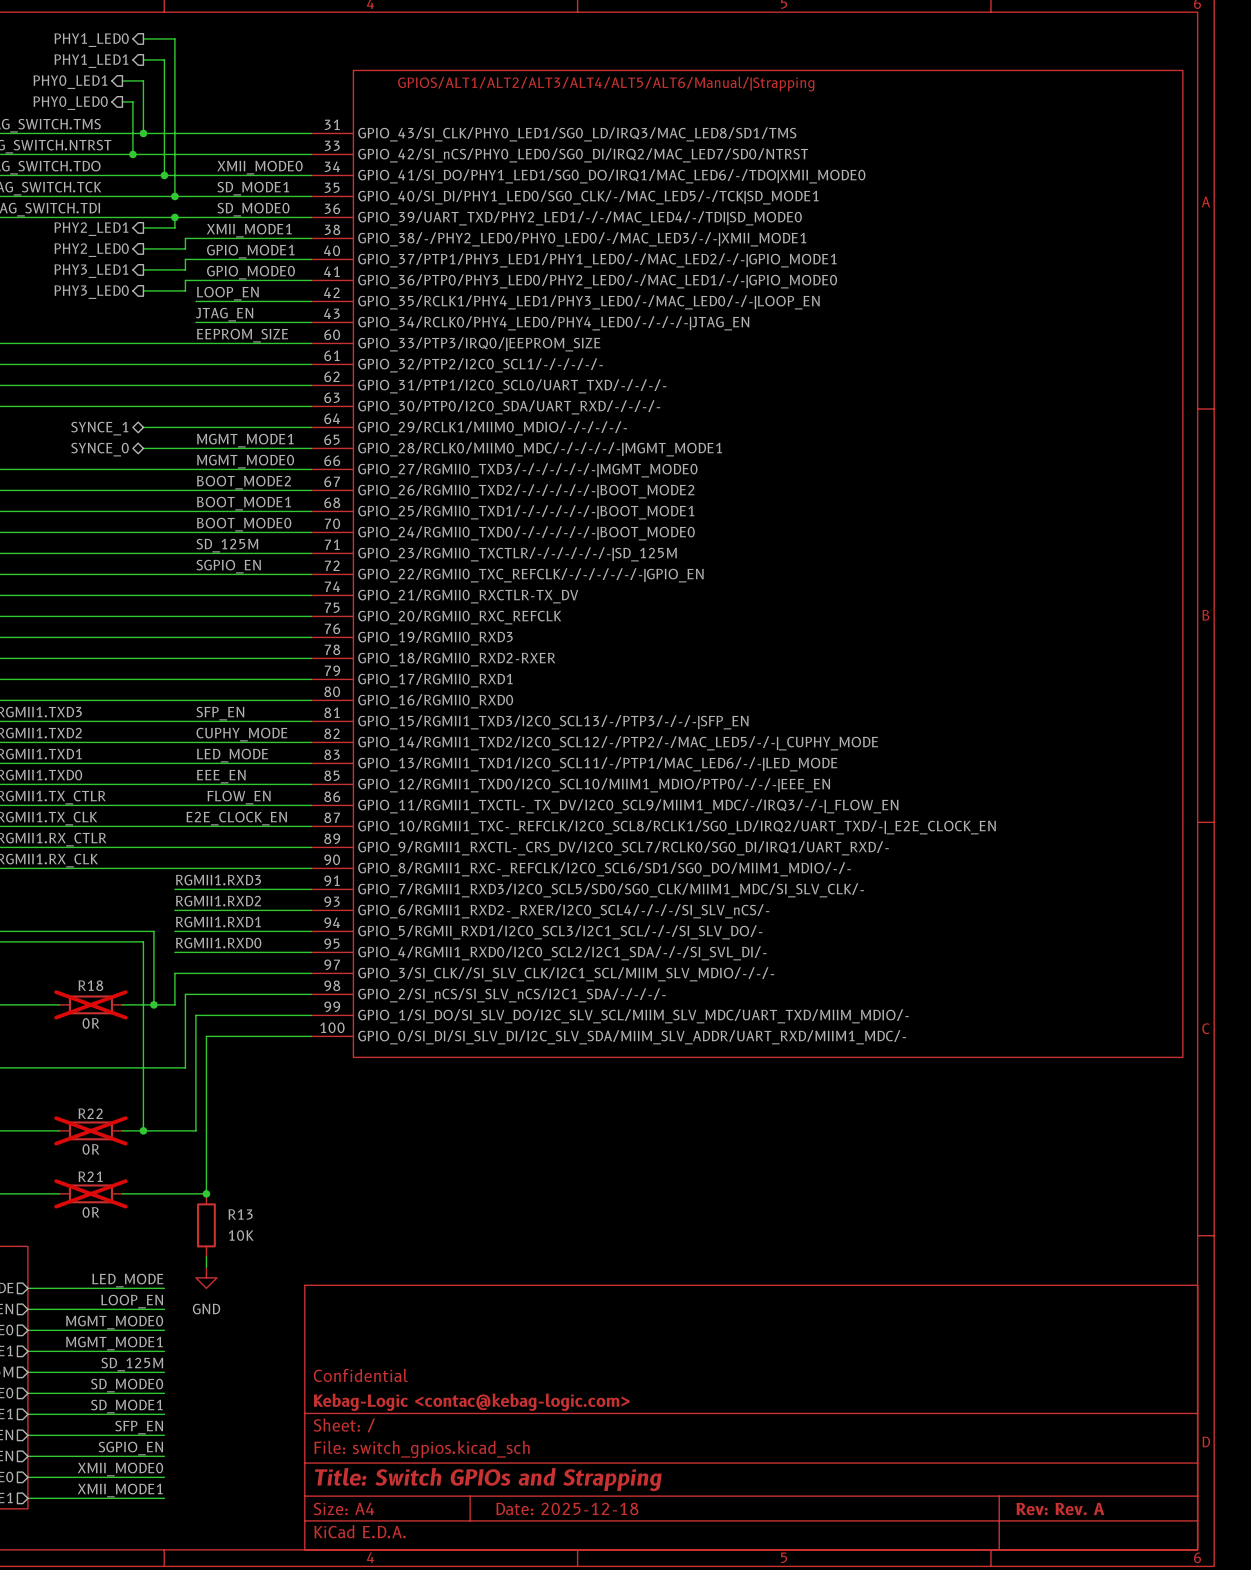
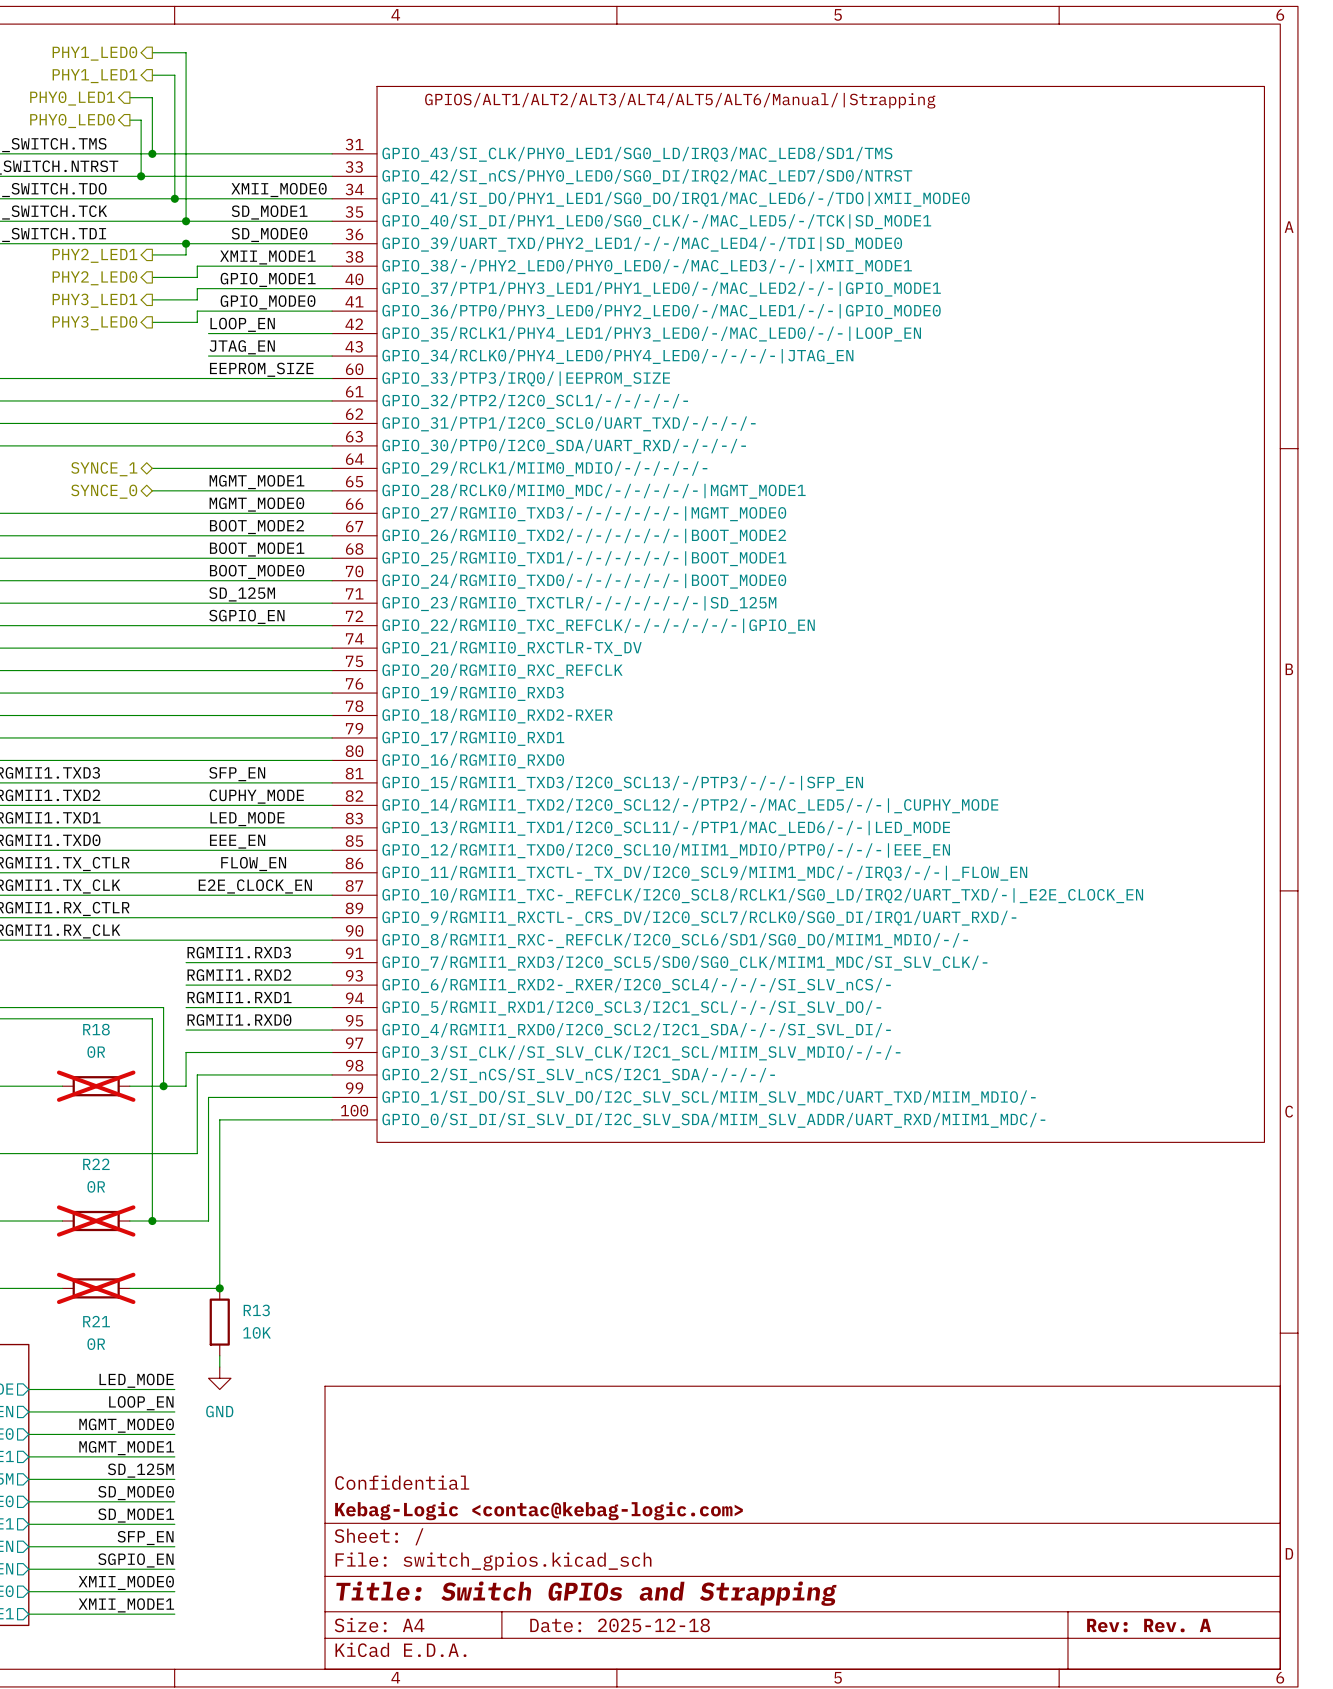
R18 name position: R18 (90, 985) -> R18 (96, 1029)
R18 value position: 0R (91, 1023) -> 0R (96, 1052)
R22 name position: R22 (90, 1113) -> R22 (96, 1164)
R22 value position: 0R (91, 1149) -> 0R (96, 1186)
R21 name position: R21 (90, 1176) -> R21 (96, 1321)
R21 value position: 0R (91, 1212) -> 0R (96, 1344)

